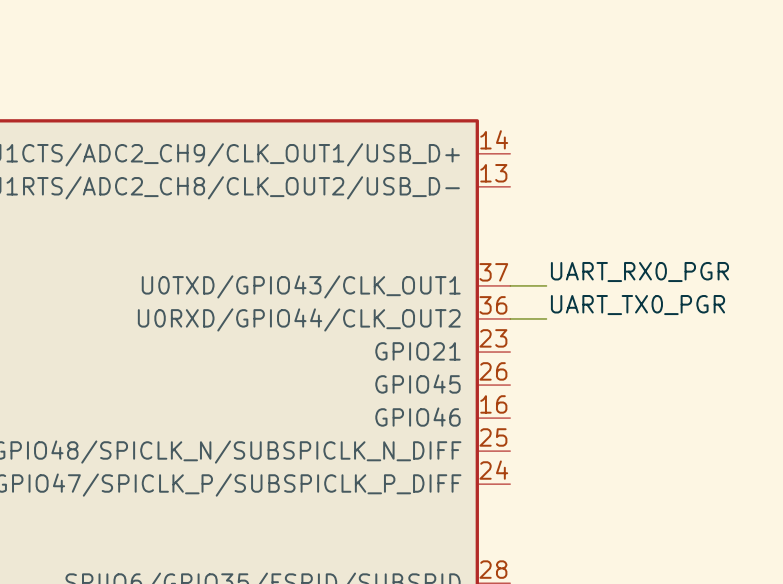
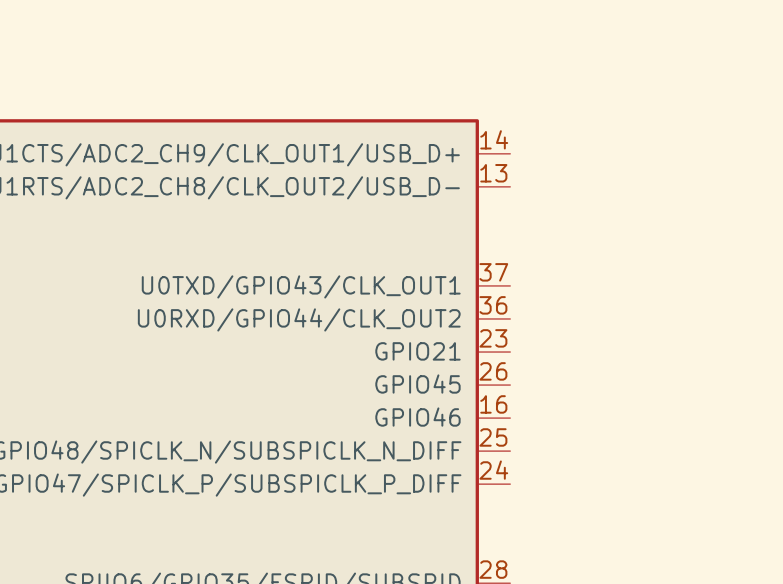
label: UART_RX0_PGR (639, 272) -> none
wire: (510, 285) (546, 285) -> none
label: UART_TX0_PGR (637, 305) -> none
wire: (510, 318) (546, 318) -> none

